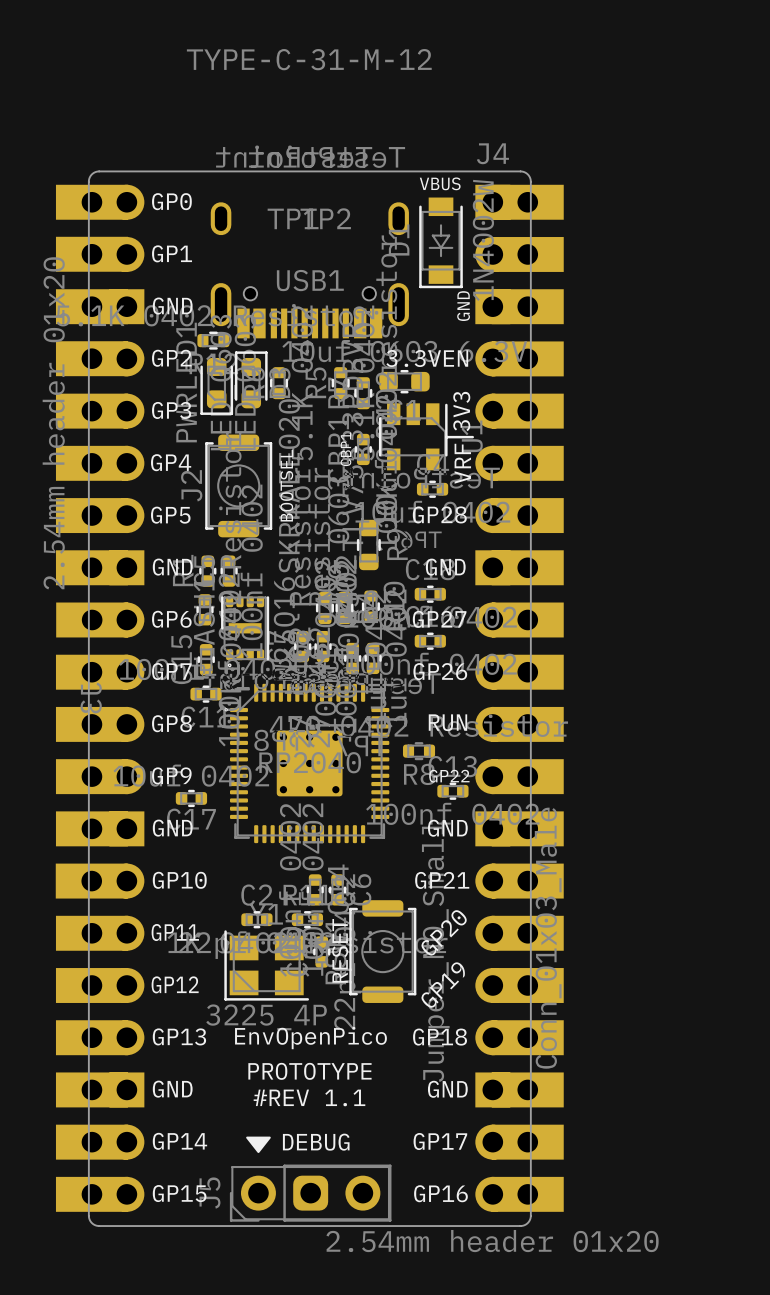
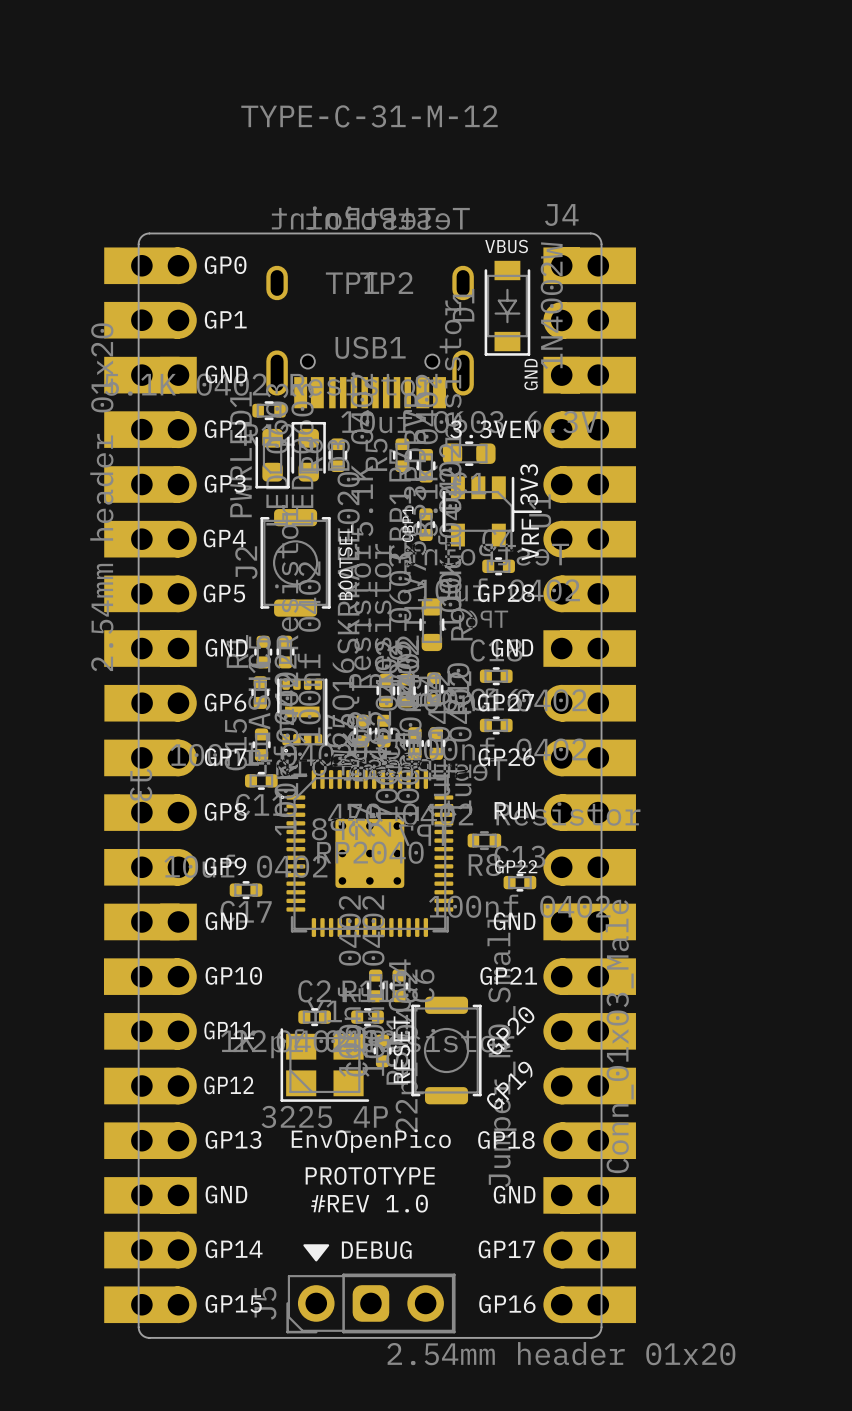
text: #REV 1.1 (309, 1097) -> #REV 1.0 (369, 1203)

